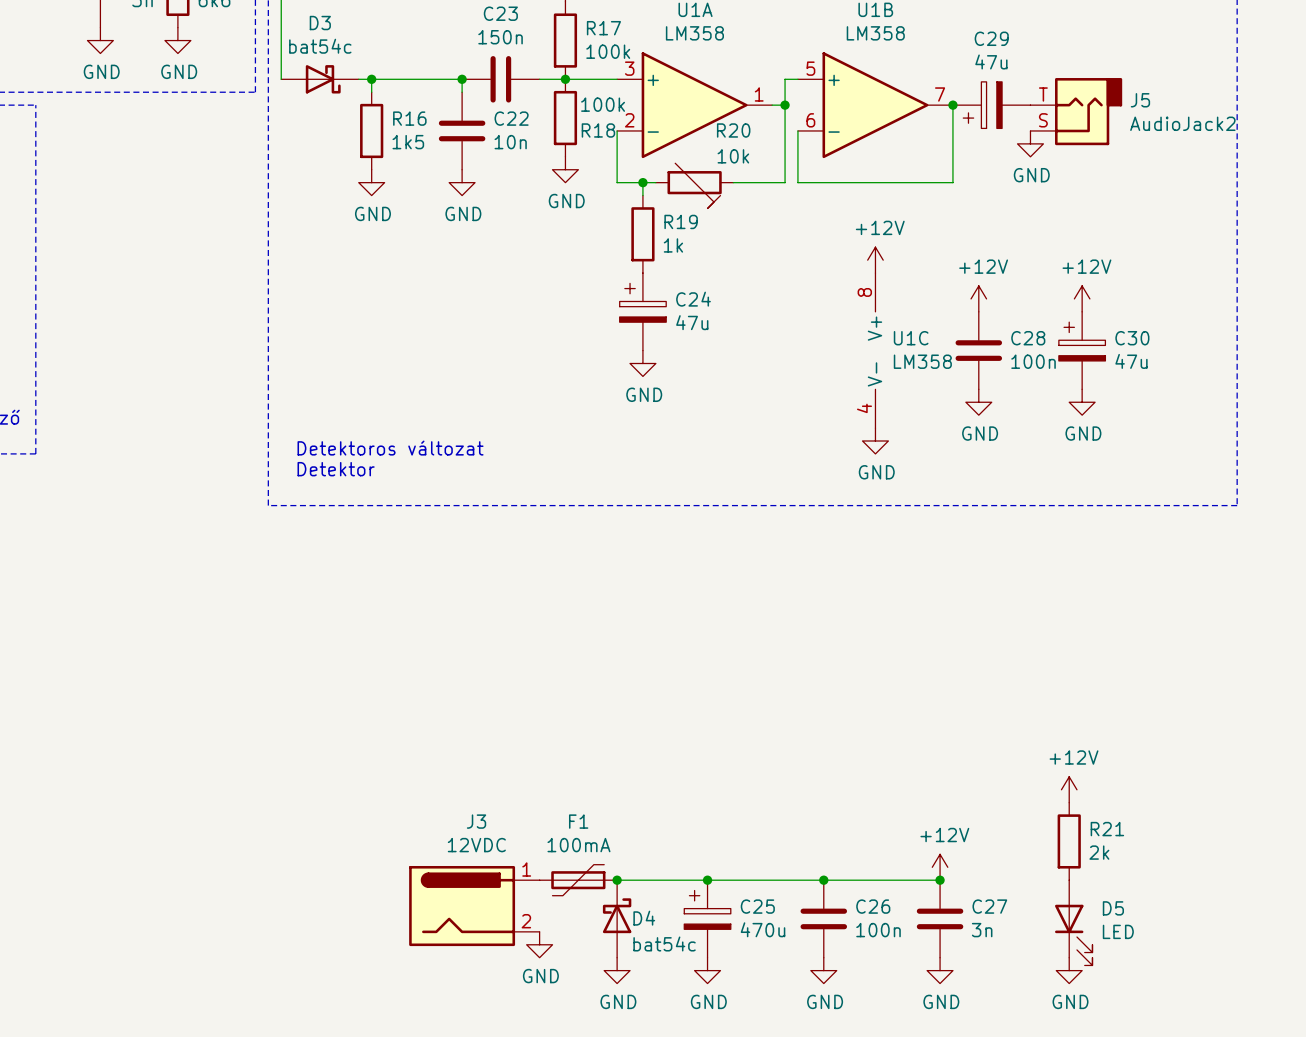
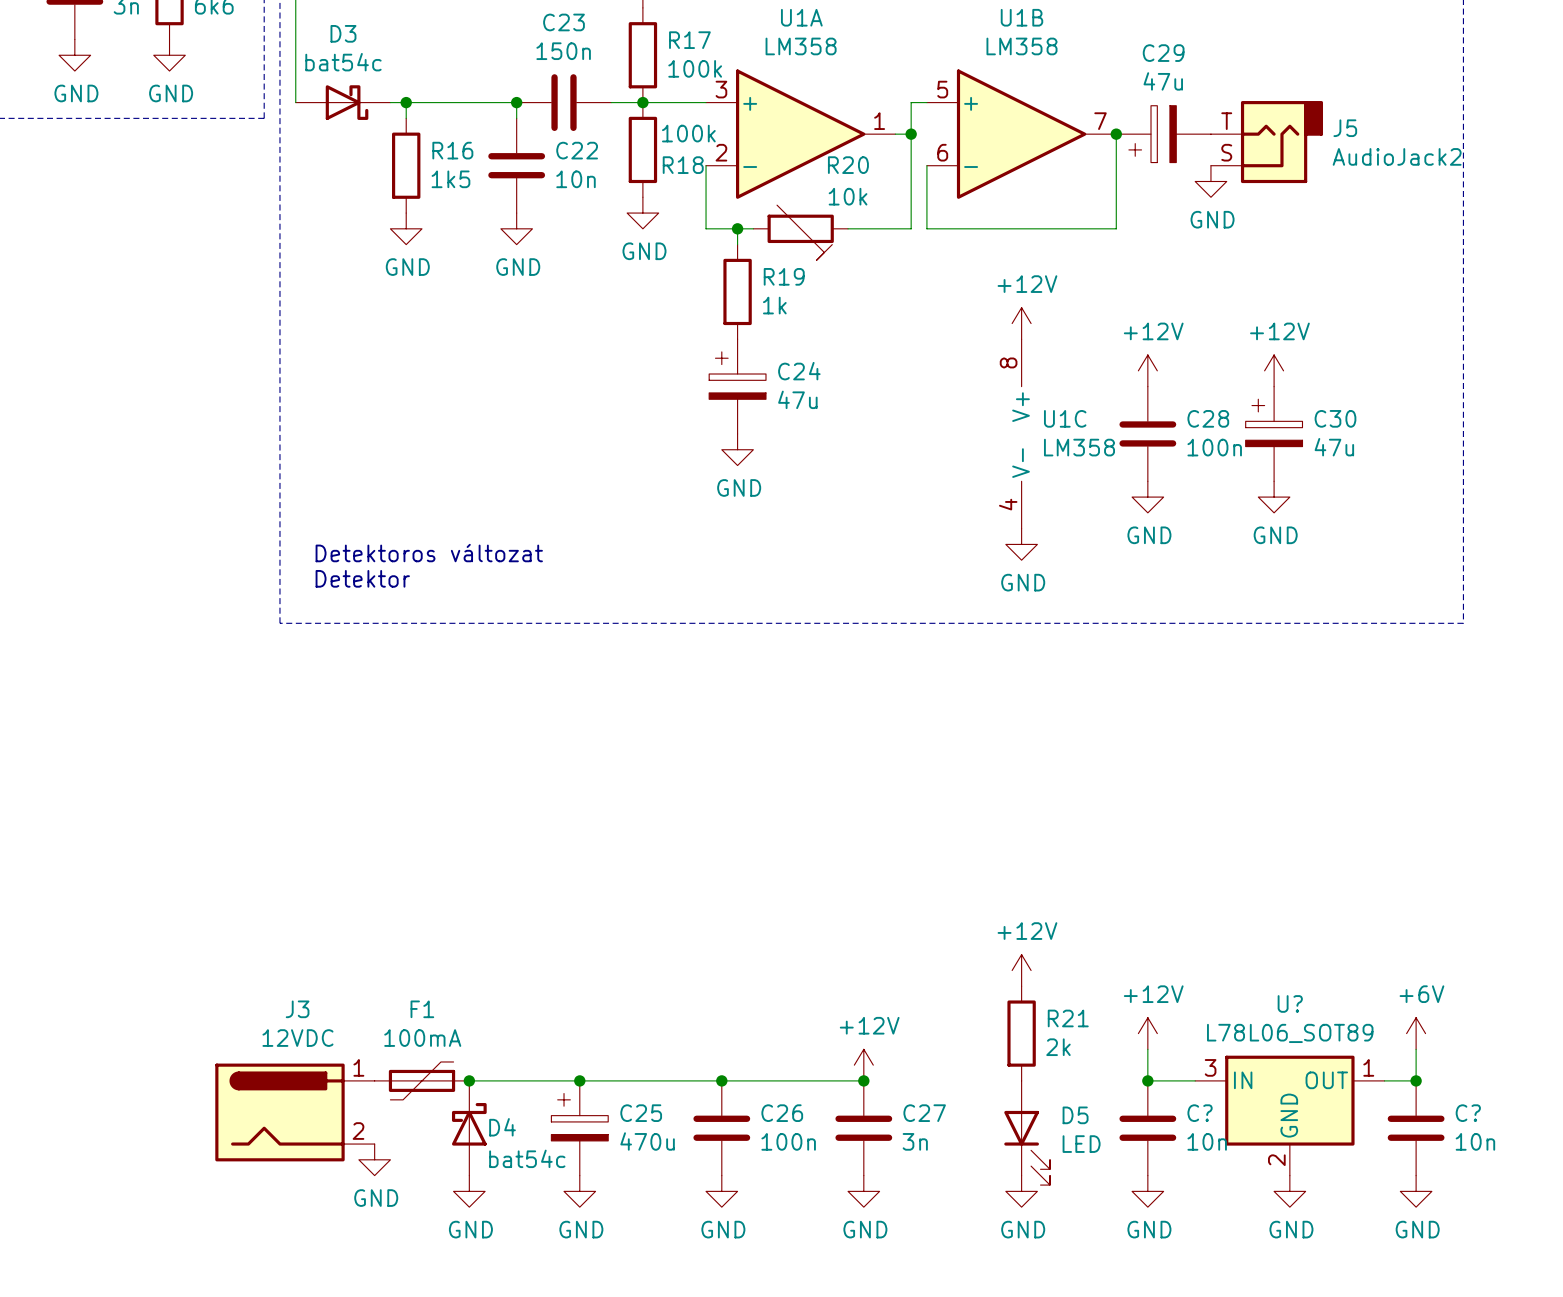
power symbol: none -> +12V (1021, 970)
power symbol: +12V (1069, 789) -> none
R21 position: (1069, 841) -> (1021, 1033)
power symbol: none -> +6V (1416, 1033)
wire: none -> (1147, 1049) (1147, 1080) (1195, 1080)
wire: none -> (1416, 1049) (1416, 1080) (1384, 1080)
power symbol: none -> +12V (863, 1065)
power symbol position: +12V (940, 867) -> +12V (1147, 1033)
junction: none -> (469, 1080)
junction: none -> (579, 1080)
F1 position: (578, 880) -> (421, 1080)
junction position: (617, 880) -> (721, 1080)
junction: (707, 880) -> none
wire: (746, 880) (940, 880) -> none
junction: none -> (863, 1080)
junction: (823, 880) -> none
junction position: (940, 880) -> (1147, 1080)
junction: none -> (1416, 1080)
J3 position: (474, 906) -> (294, 1112)
U?: none -> L78L06_SOT89 (1289, 1115)
D4 position: (617, 918) -> (469, 1128)
C25 position: (707, 918) -> (579, 1128)
C26 position: (823, 918) -> (721, 1128)
C27 position: (940, 918) -> (863, 1128)
C?: none -> 10n (1147, 1128)
C?: none -> 10n (1416, 1128)
D5 position: (1073, 922) -> (1027, 1132)
power symbol: none -> GND (374, 1159)
power symbol position: GND (539, 944) -> GND (579, 1191)
power symbol: none -> GND (469, 1191)
power symbol position: GND (617, 970) -> GND (721, 1191)
power symbol: GND (707, 970) -> none
power symbol: none -> GND (863, 1191)
power symbol: GND (823, 970) -> none
power symbol: none -> GND (1021, 1191)
power symbol: GND (940, 970) -> none
power symbol: none -> GND (1147, 1191)
power symbol position: GND (1069, 970) -> GND (1289, 1191)
power symbol: none -> GND (1416, 1191)

